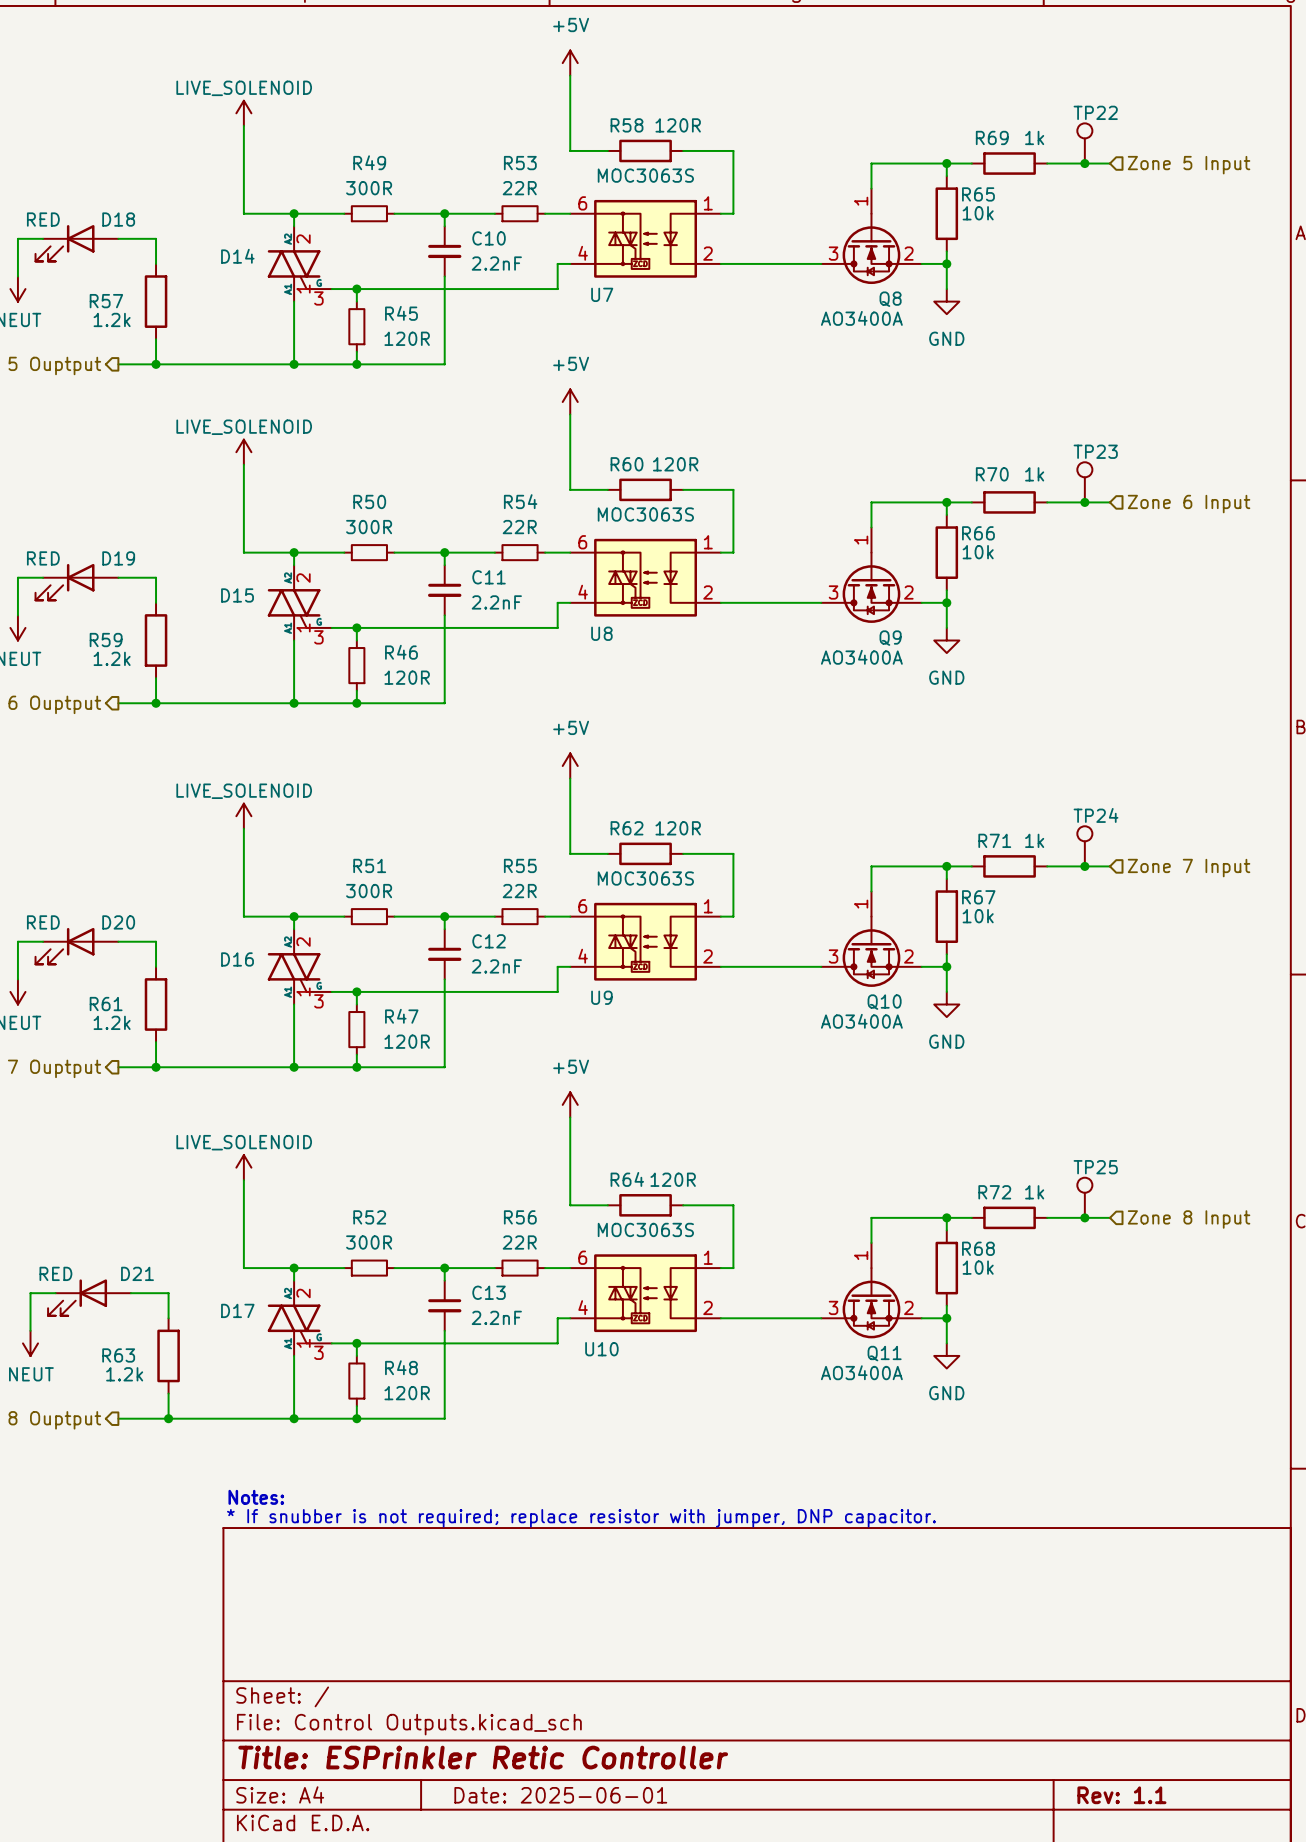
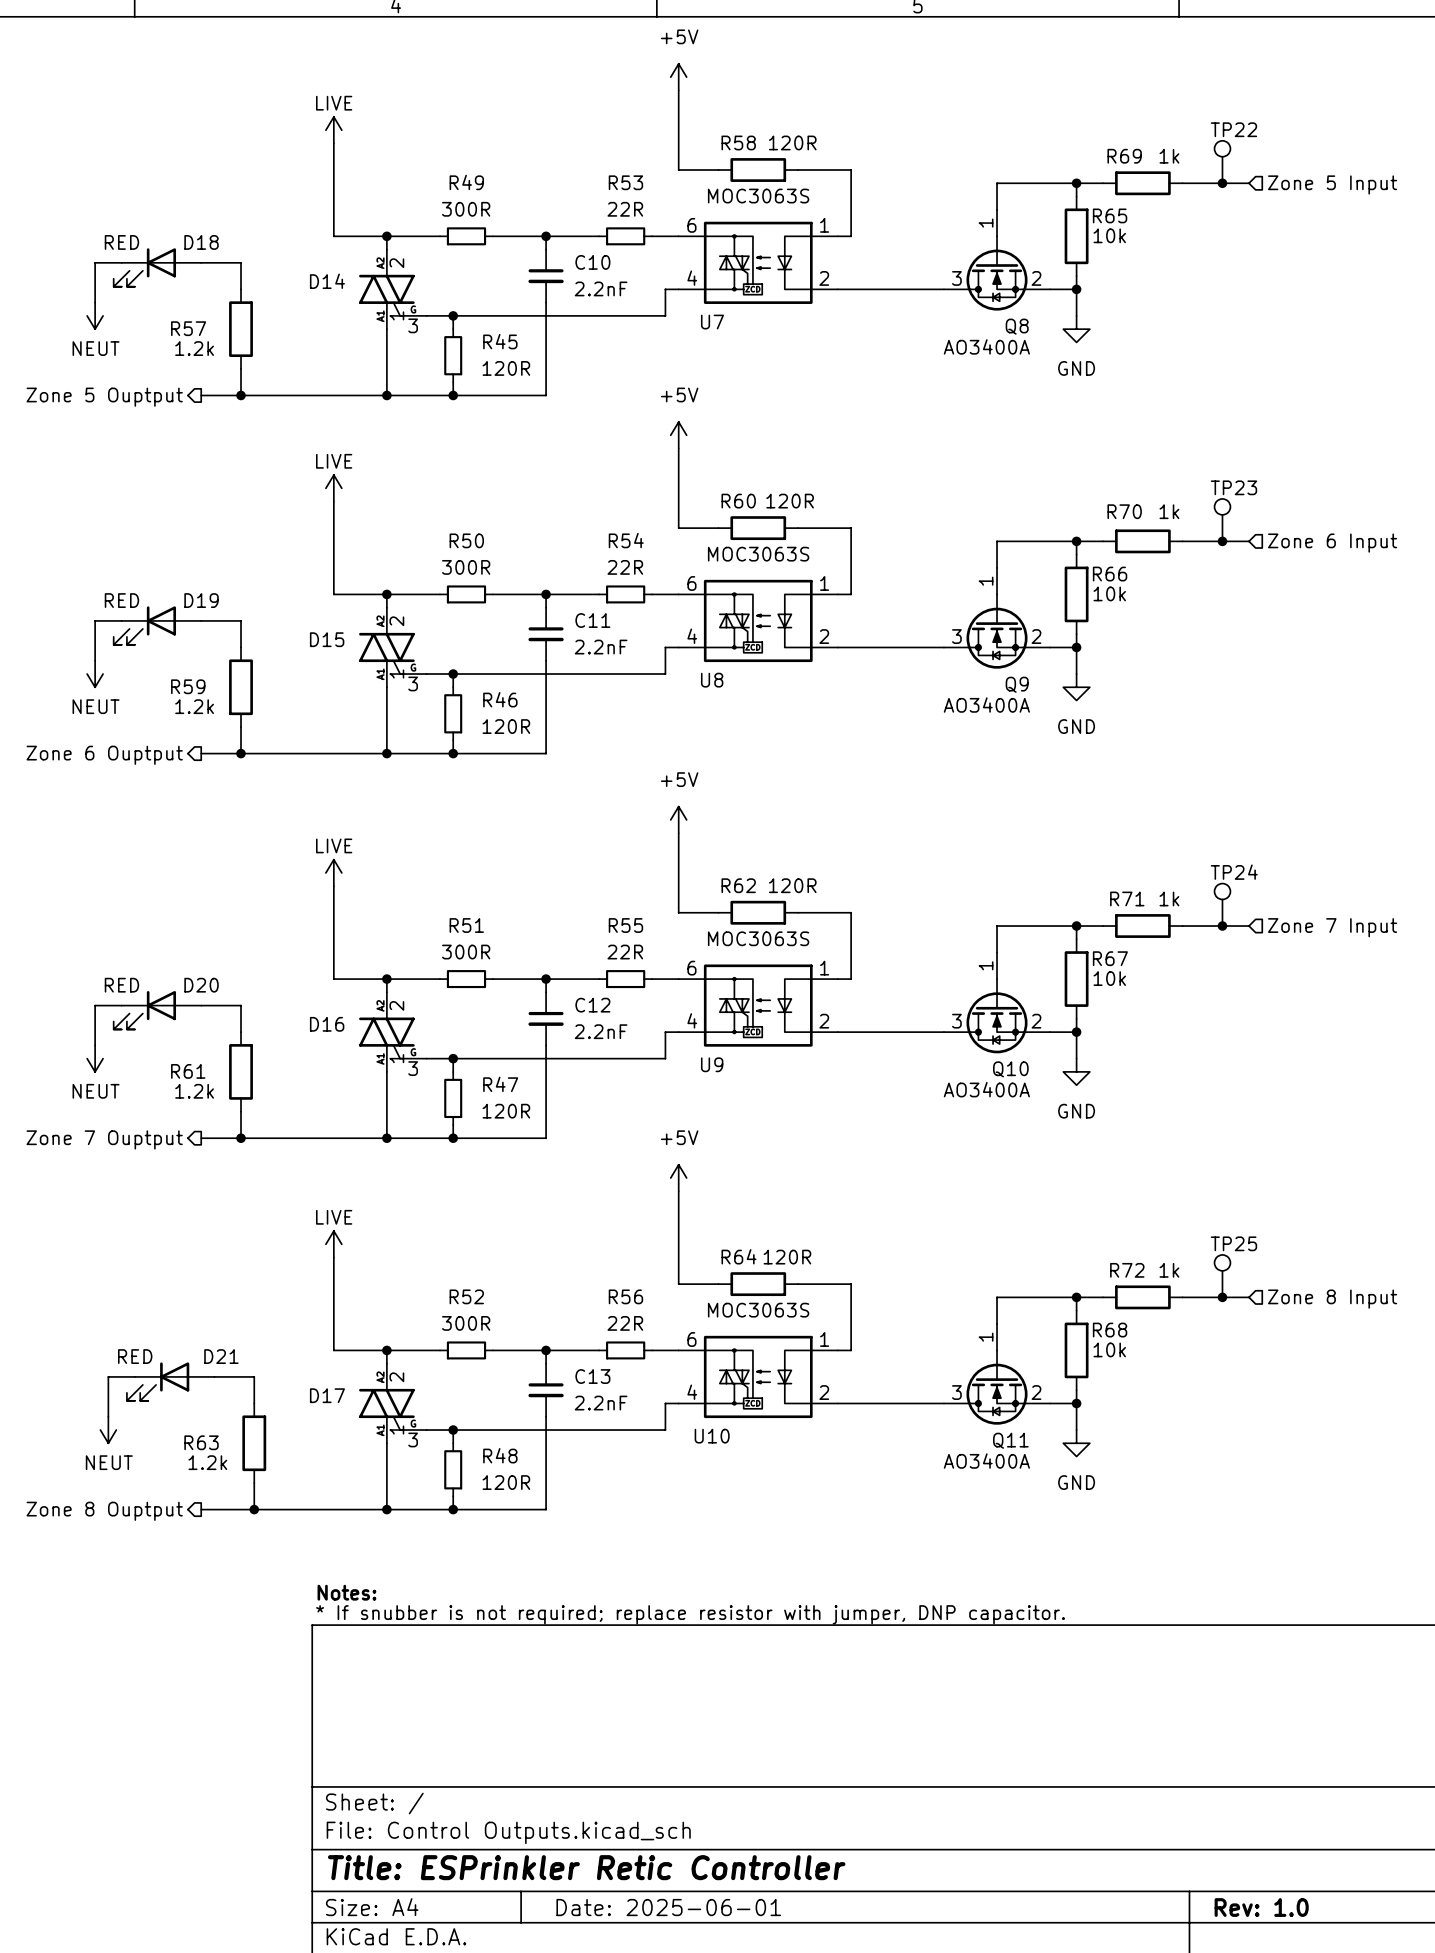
power symbol: LIVE_SOLENOID (243, 113) -> LIVE (333, 130)
power symbol: LIVE_SOLENOID (243, 452) -> LIVE (333, 488)
power symbol: LIVE_SOLENOID (243, 816) -> LIVE (333, 872)
power symbol: LIVE_SOLENOID (243, 1167) -> LIVE (333, 1244)
title block: Rev: 1.1 (1121, 1795) -> Rev: 1.0 (1261, 1907)

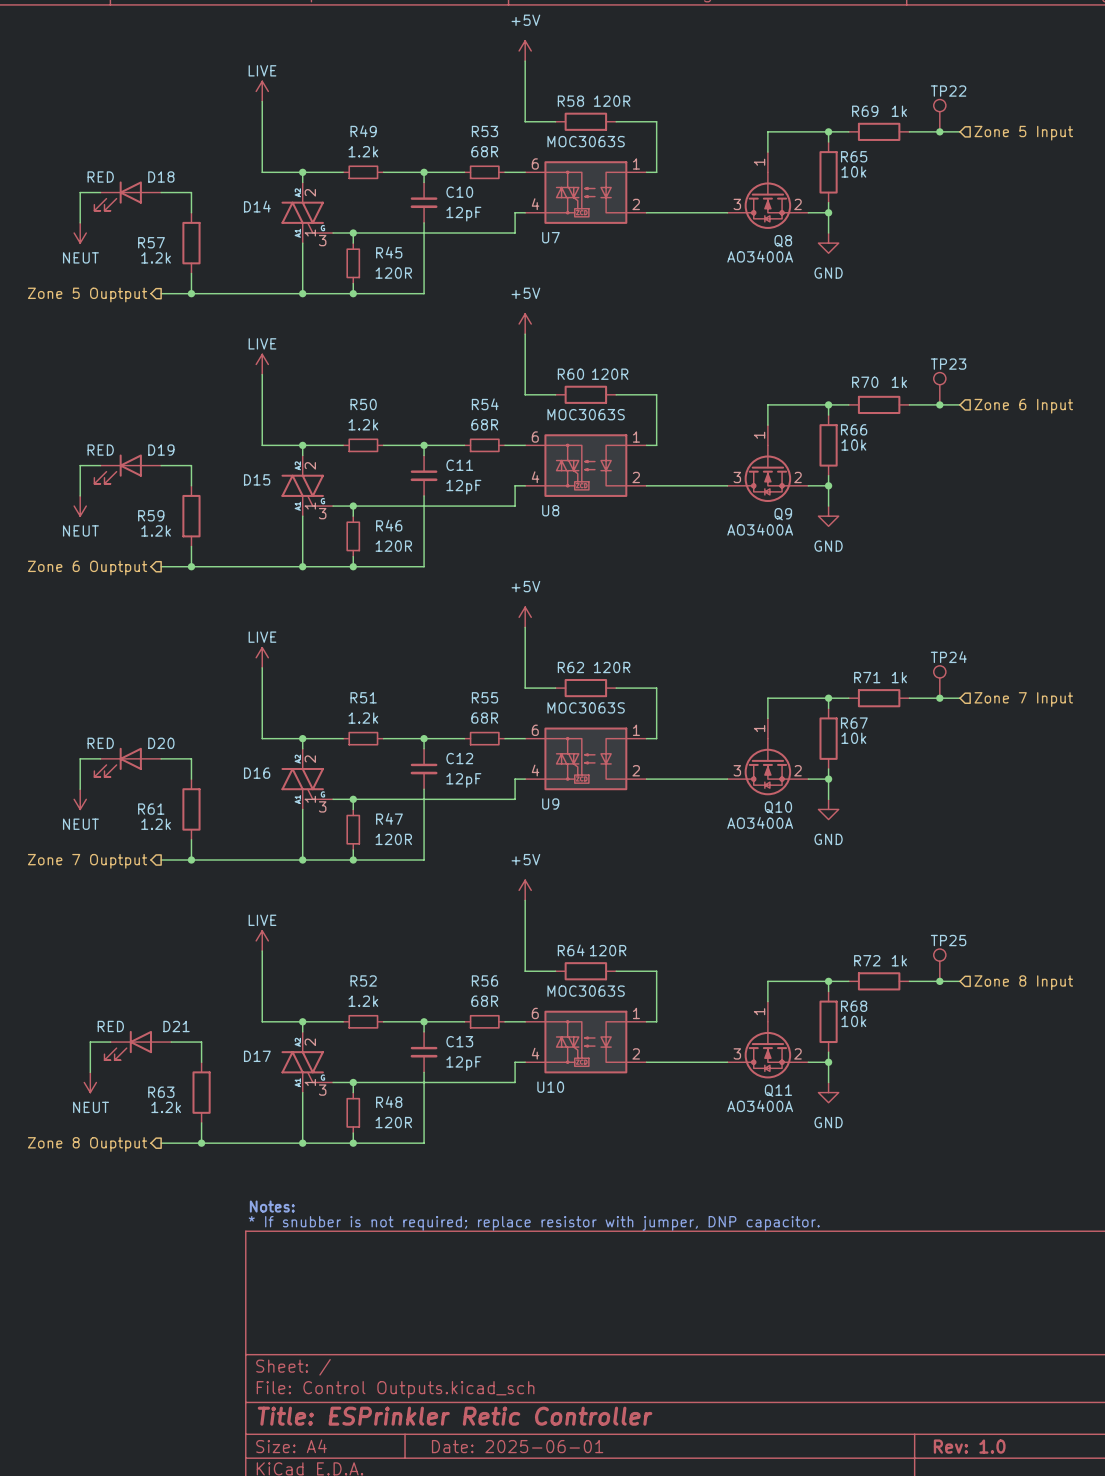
R49 value: 300R (466, 209) -> 1.2k (363, 151)
R53 value: 22R (625, 209) -> 68R (484, 151)
C10 value: 2.2nF (601, 288) -> 12pF (463, 214)
R50 value: 300R (466, 567) -> 1.2k (363, 424)
R54 value: 22R (625, 567) -> 68R (484, 424)
C11 value: 2.2nF (601, 647) -> 12pF (463, 487)
R51 value: 300R (466, 952) -> 1.2k (363, 718)
R55 value: 22R (625, 952) -> 68R (484, 718)
C12 value: 2.2nF (601, 1031) -> 12pF (463, 780)
R52 value: 300R (466, 1323) -> 1.2k (363, 1001)
R56 value: 22R (625, 1323) -> 68R (484, 1001)
C13 value: 2.2nF (601, 1403) -> 12pF (463, 1063)

